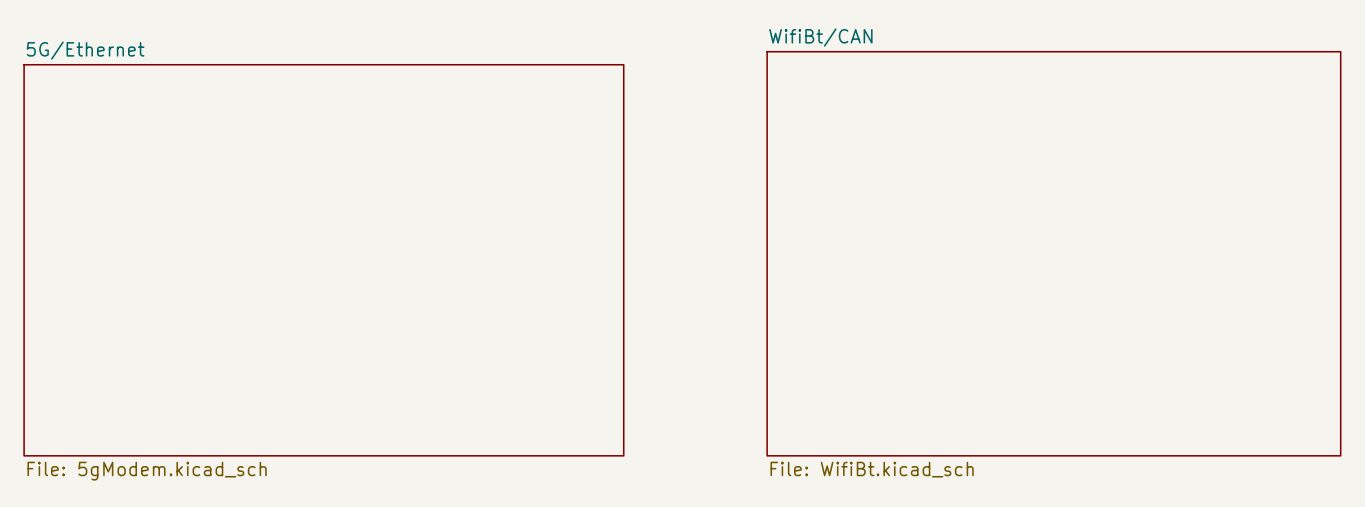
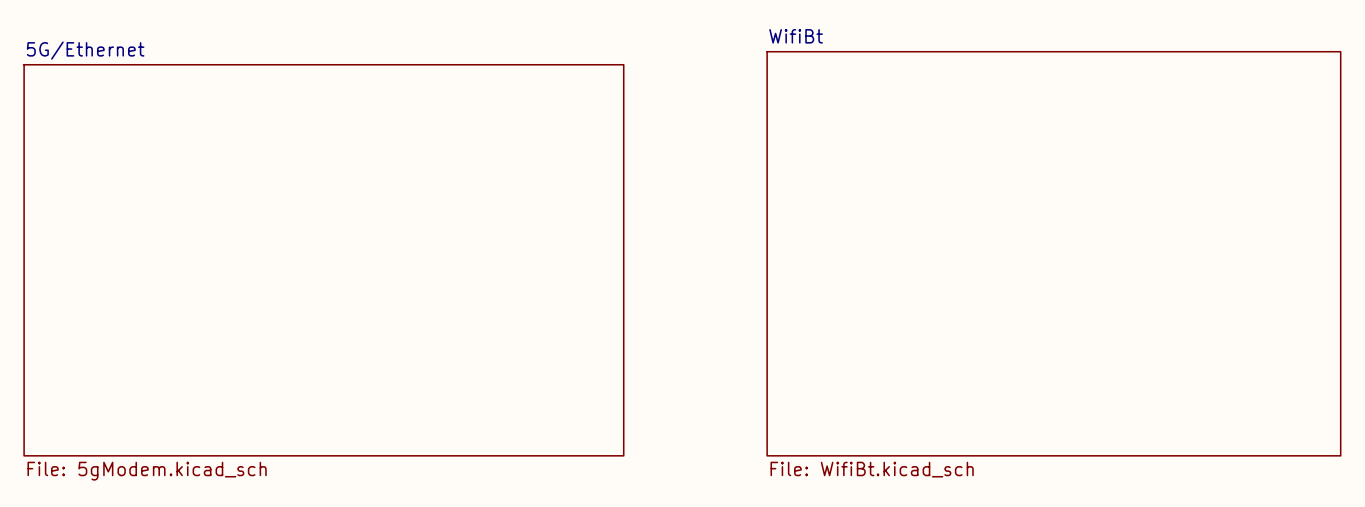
sheet WifiBt/CAN name: WifiBt/CAN (820, 37) -> WifiBt (796, 36)

